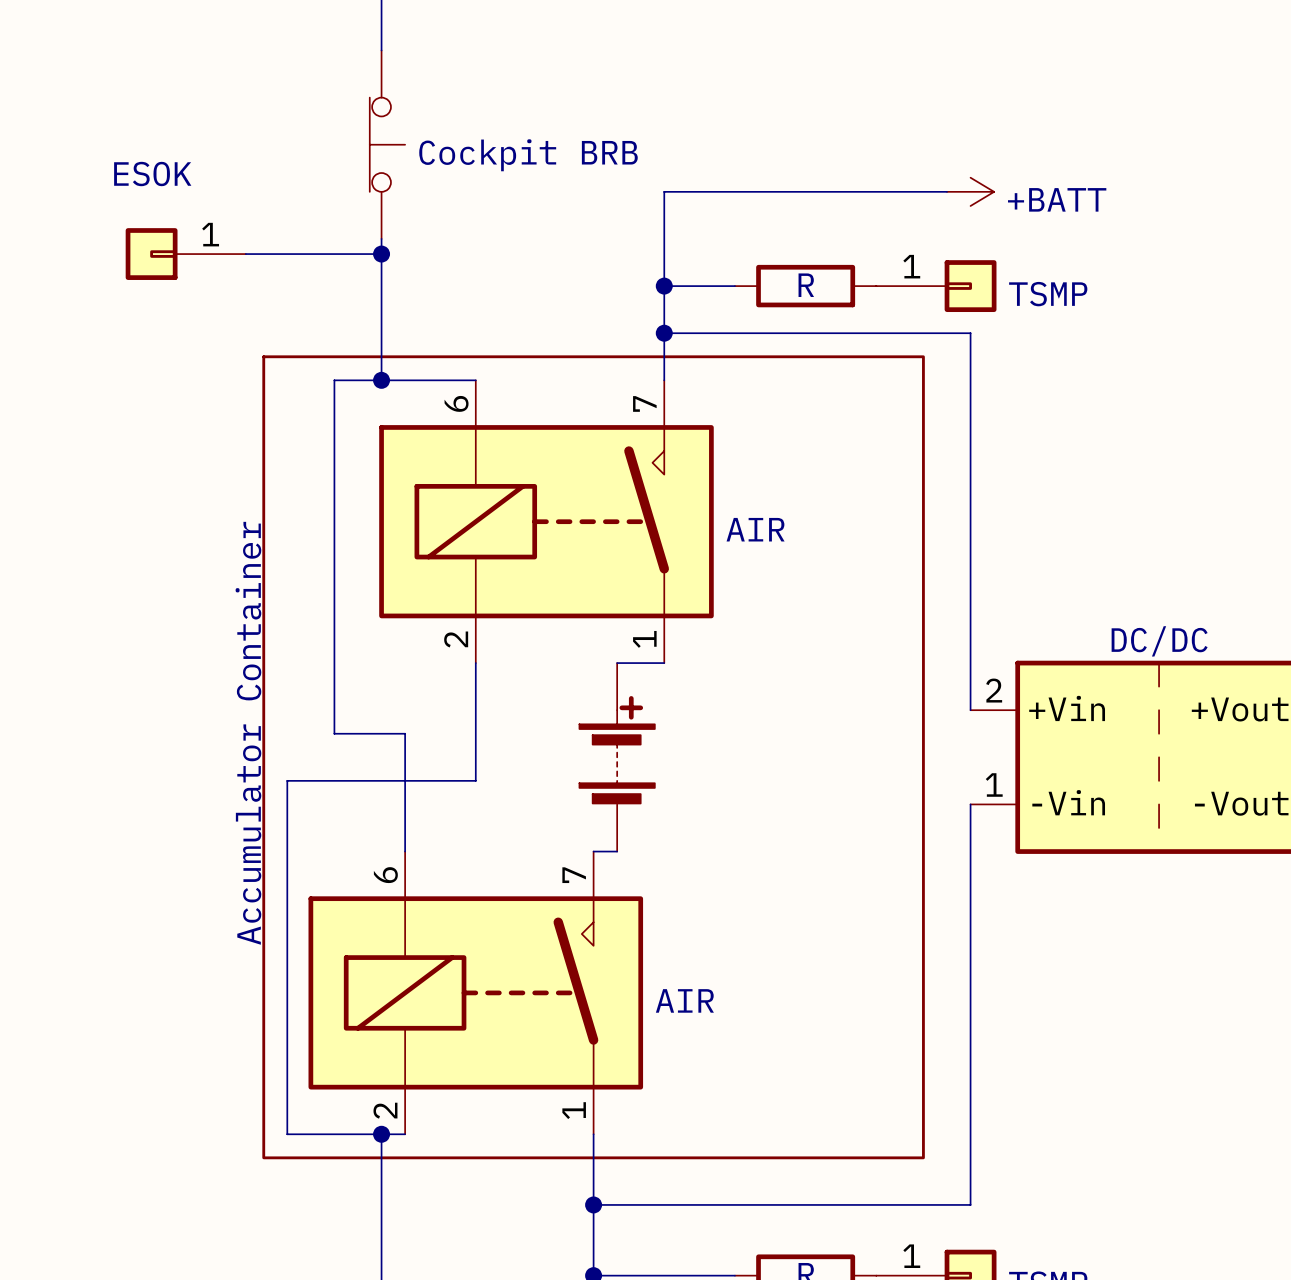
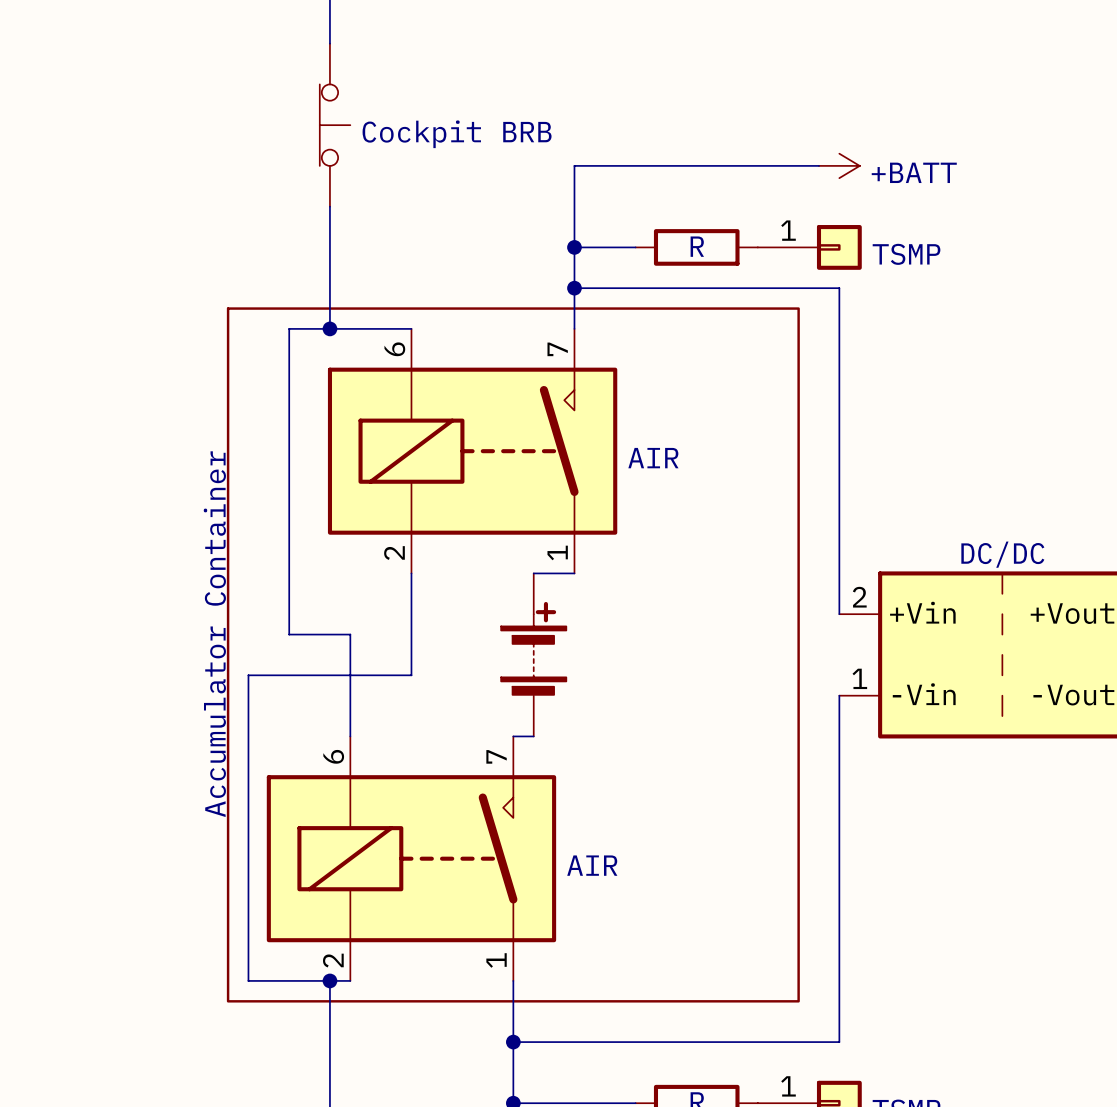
part: ESOK (185, 254) -> none
wire: (245, 254) (381, 254) -> none
junction: (381, 254) -> none

